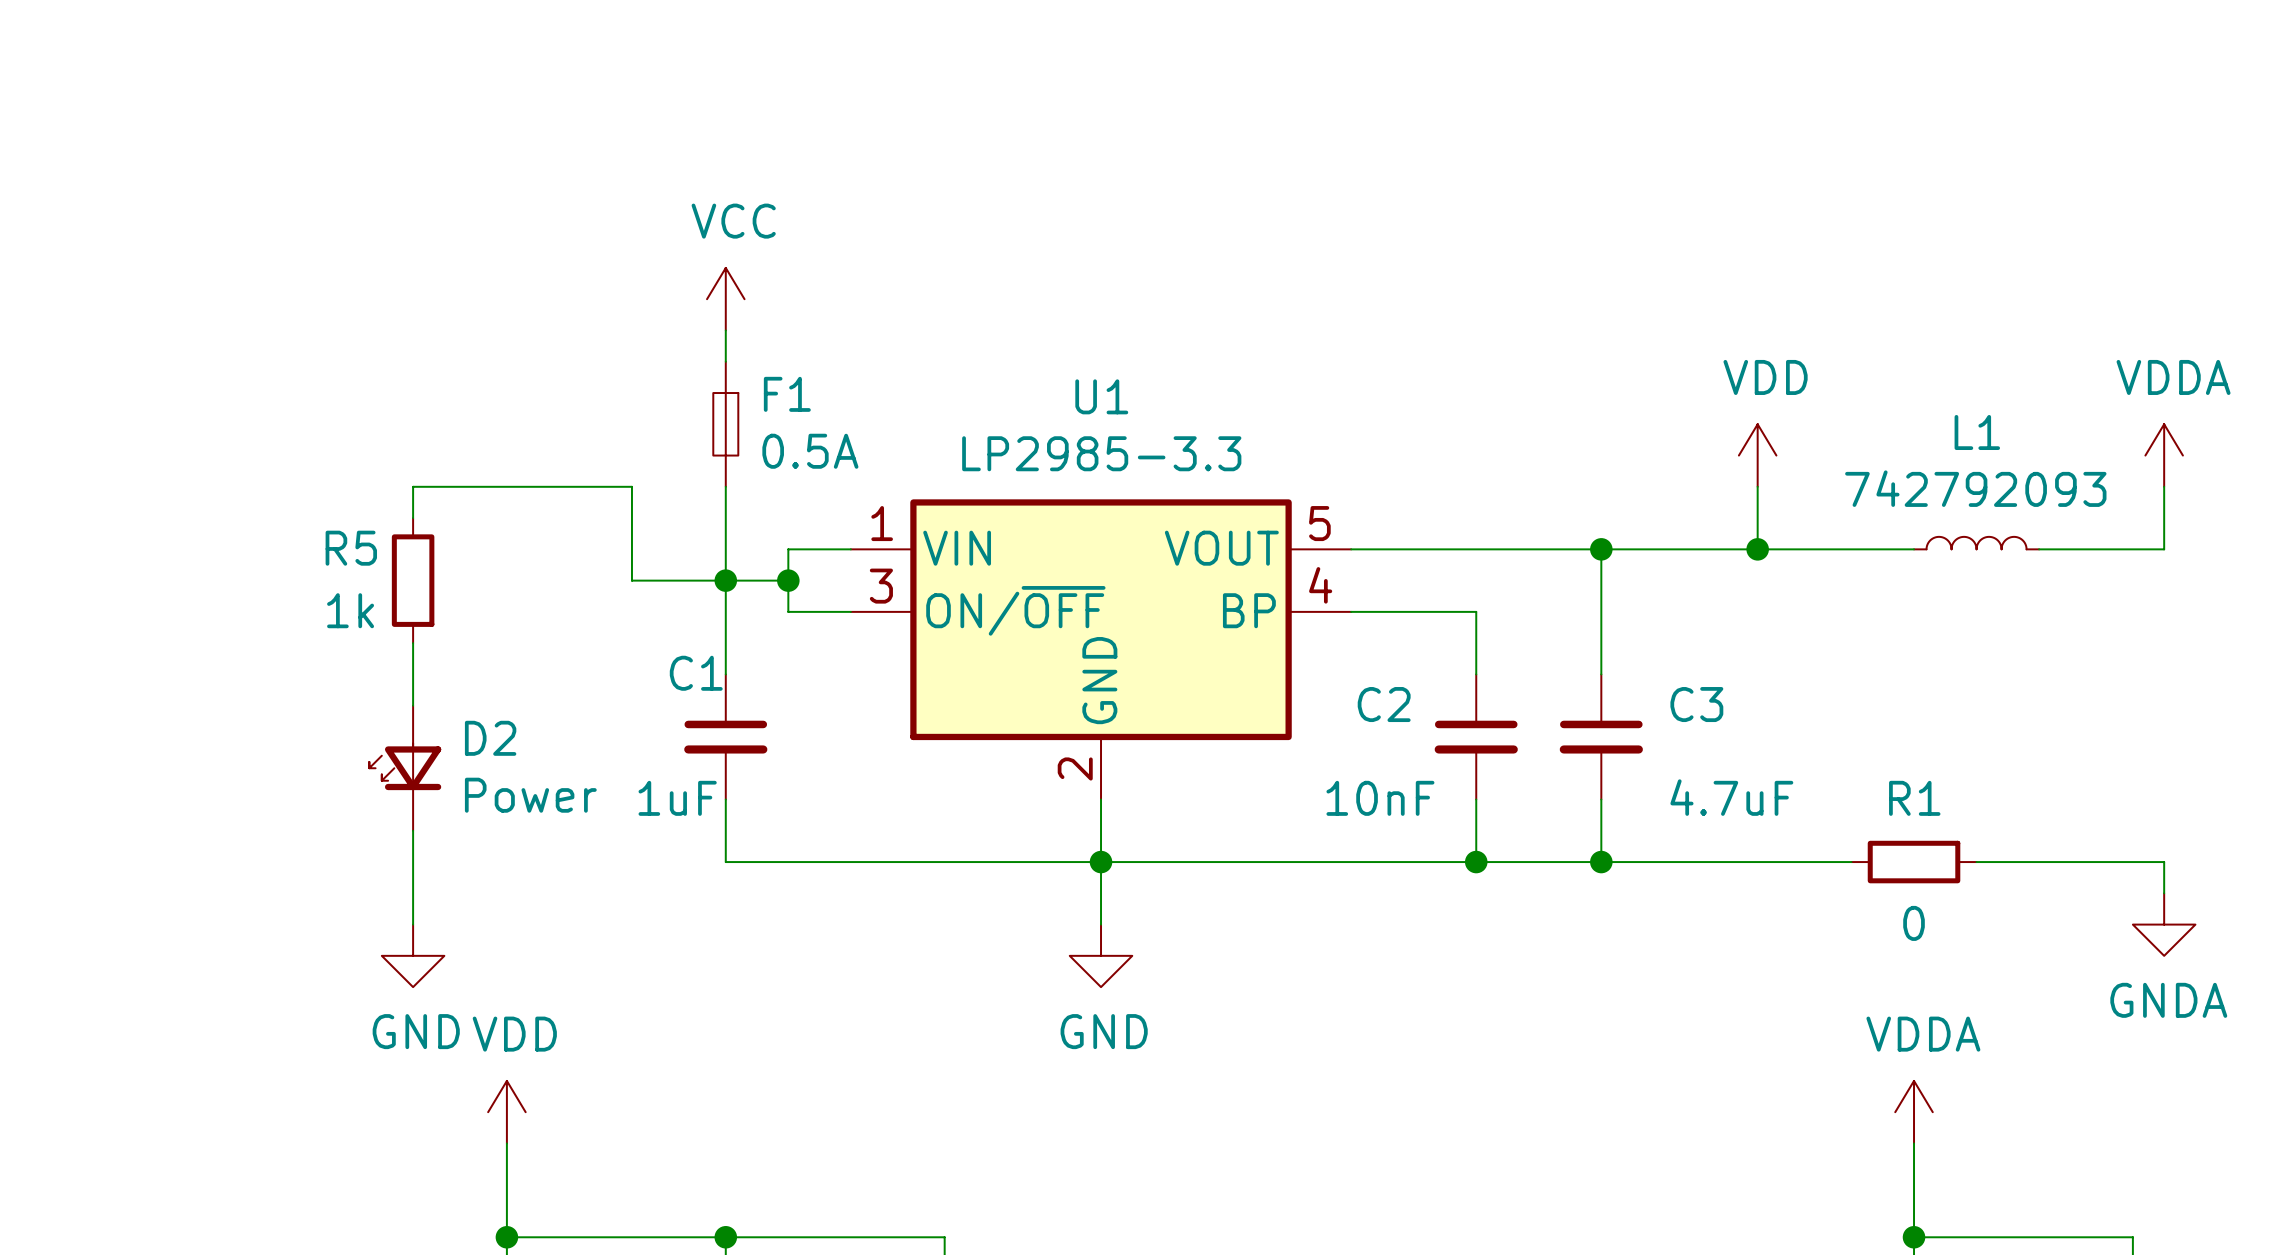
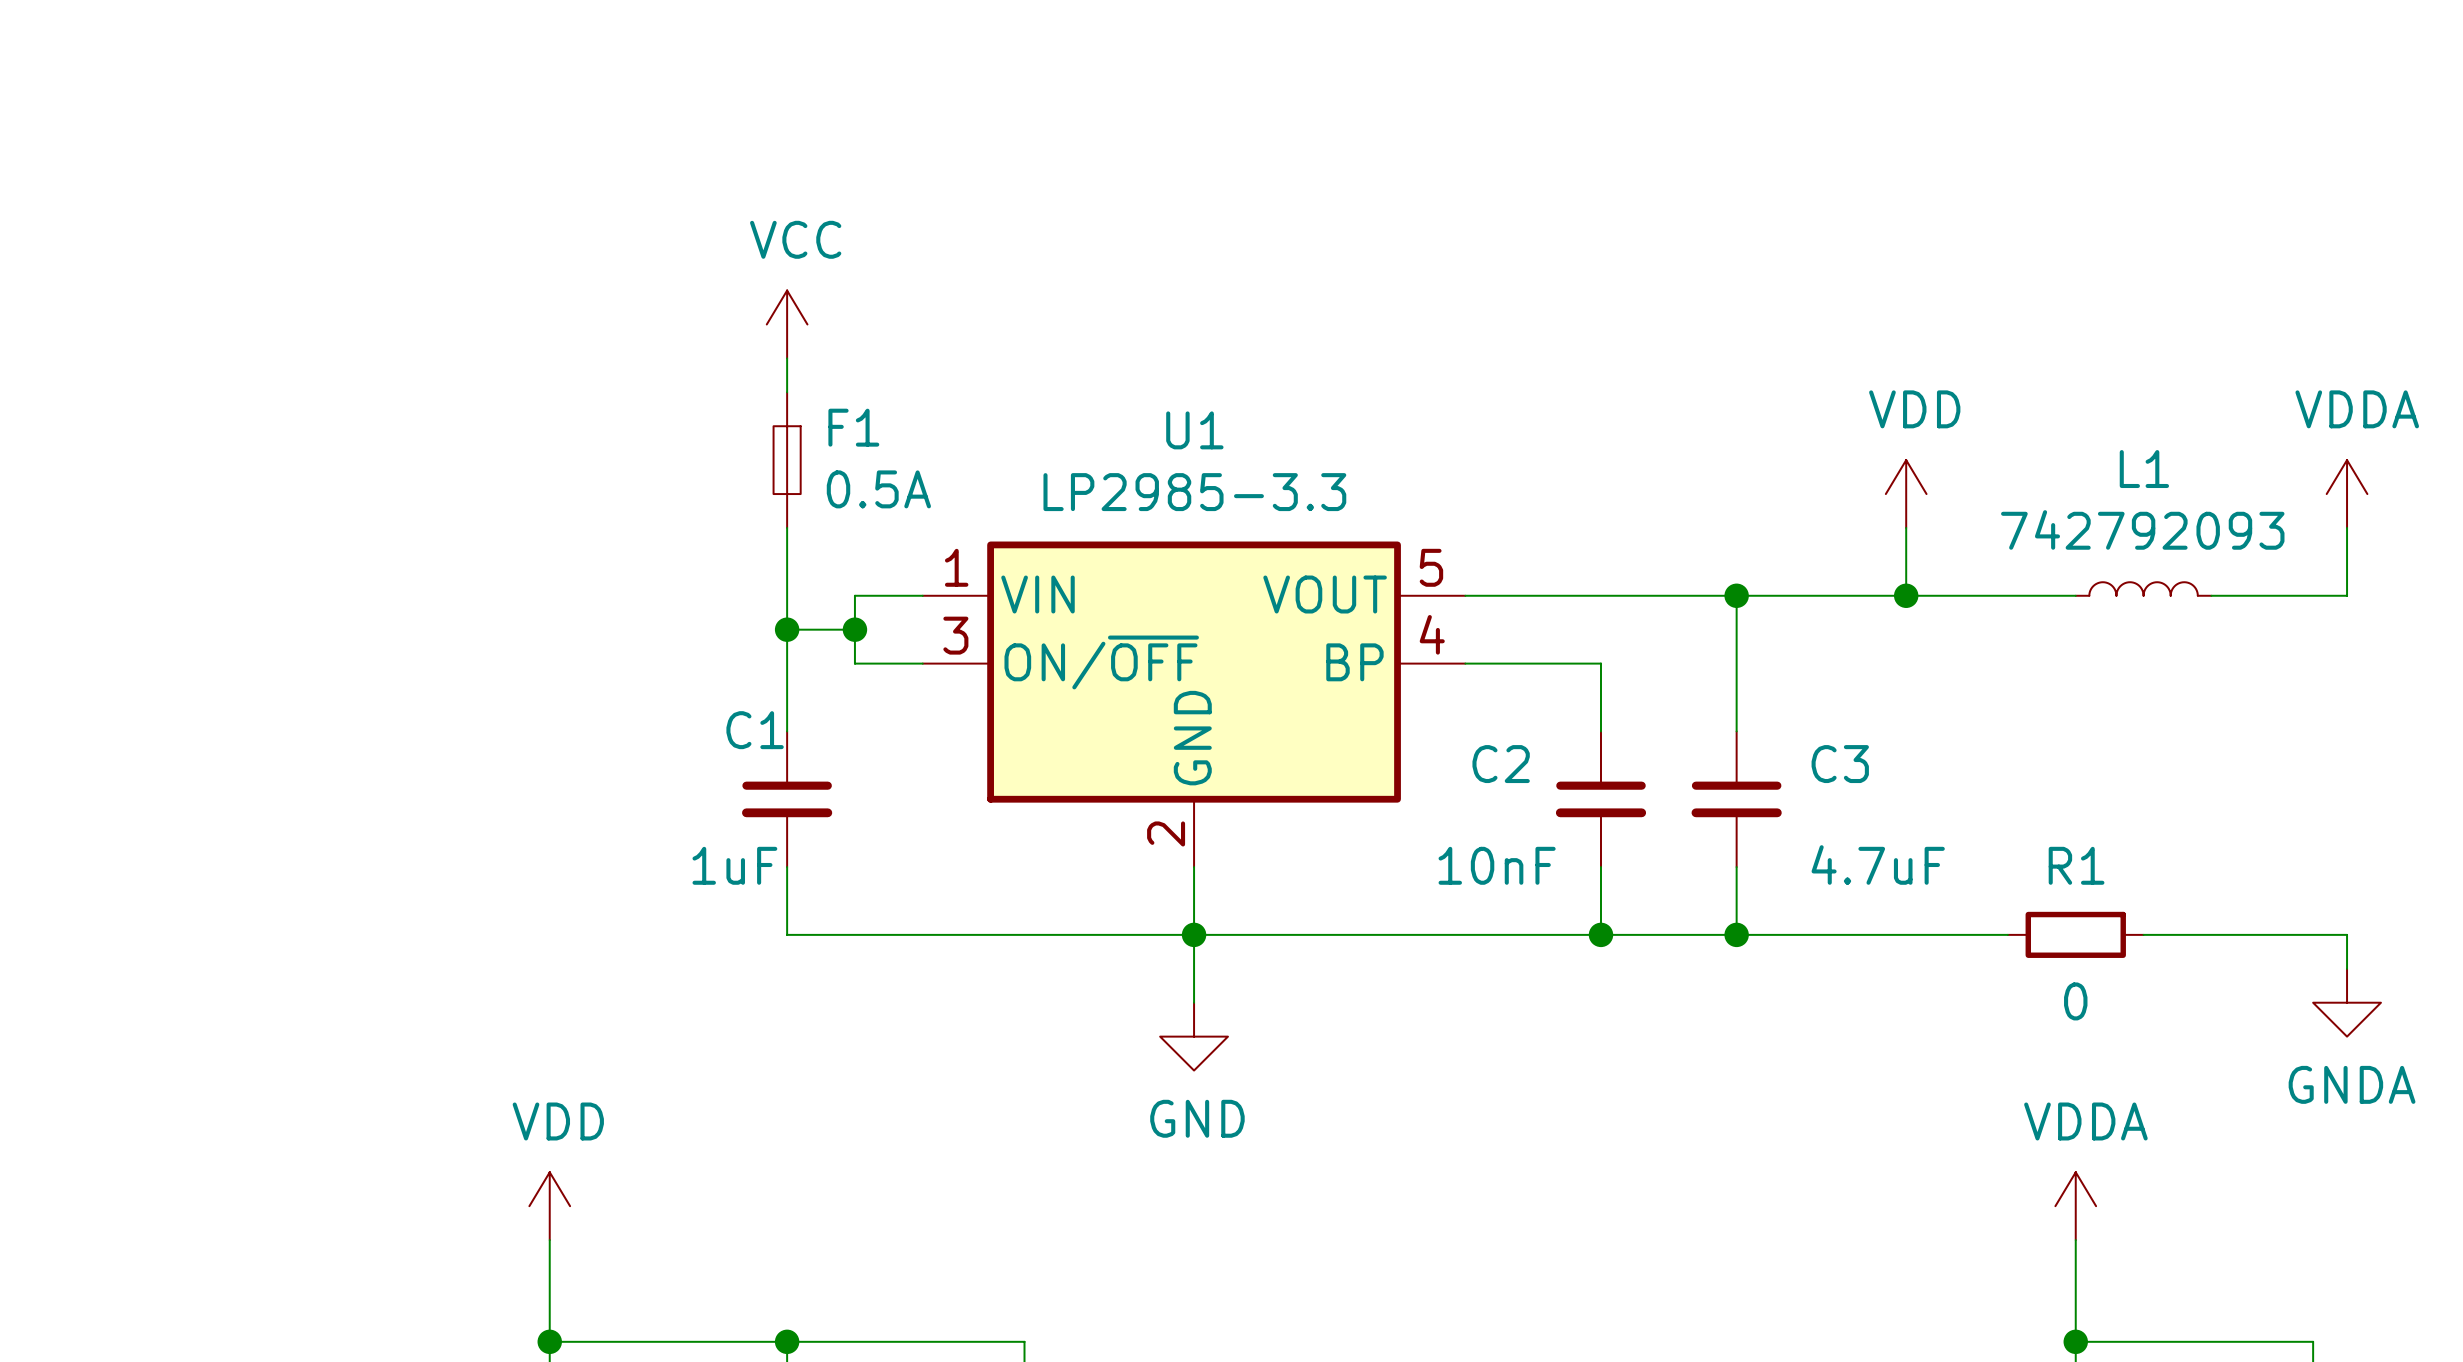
wire: (413, 518) (413, 486) (631, 486) (631, 580) (725, 580) -> none
R5: 1k (413, 580) -> none
wire: (413, 643) (413, 705) -> none
D2: Power (405, 768) -> none
wire: (413, 830) (413, 924) -> none
power symbol: GND (413, 955) -> none

